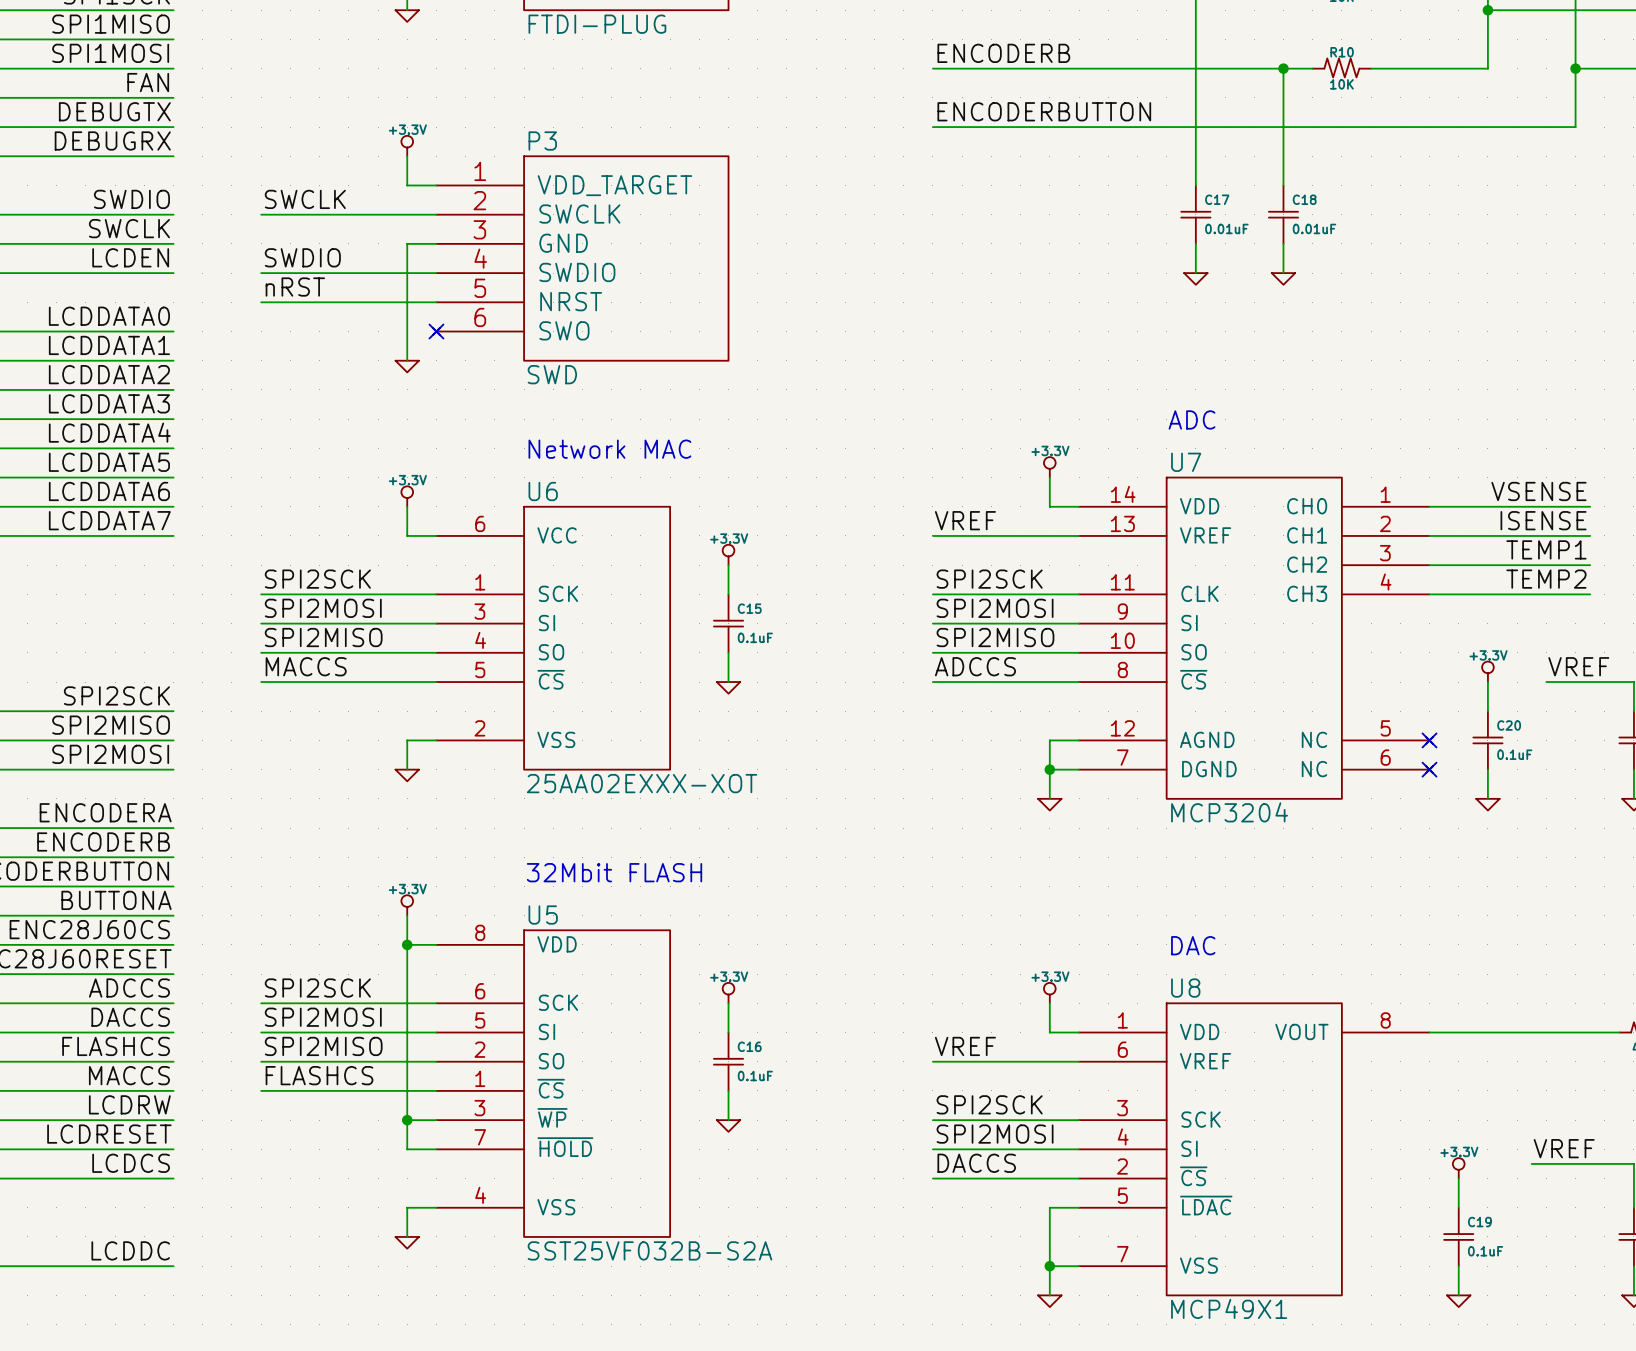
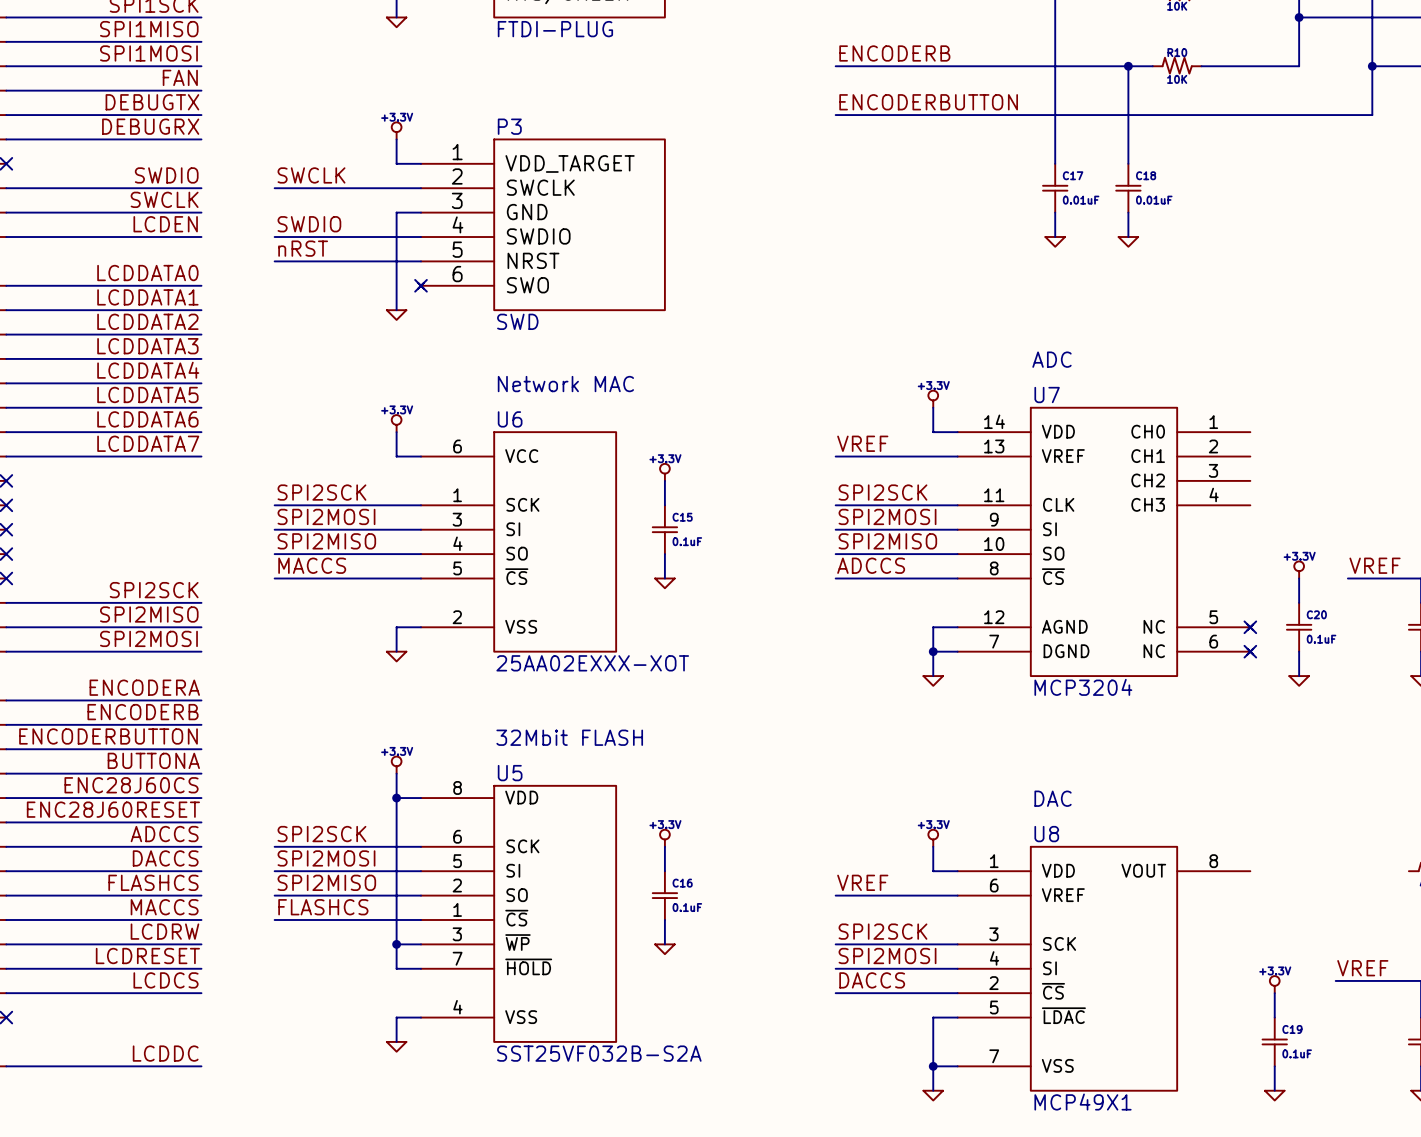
label: VSENSE (1538, 491) -> none
wire: (1429, 506) (1590, 506) -> none
label: ISENSE (1543, 520) -> none
wire: (1429, 535) (1590, 535) -> none
label: TEMP1 (1546, 549) -> none
wire: (1429, 565) (1590, 565) -> none
label: TEMP2 (1546, 579) -> none
wire: (1429, 594) (1590, 594) -> none
wire: (1429, 1032) (1619, 1032) -> none

